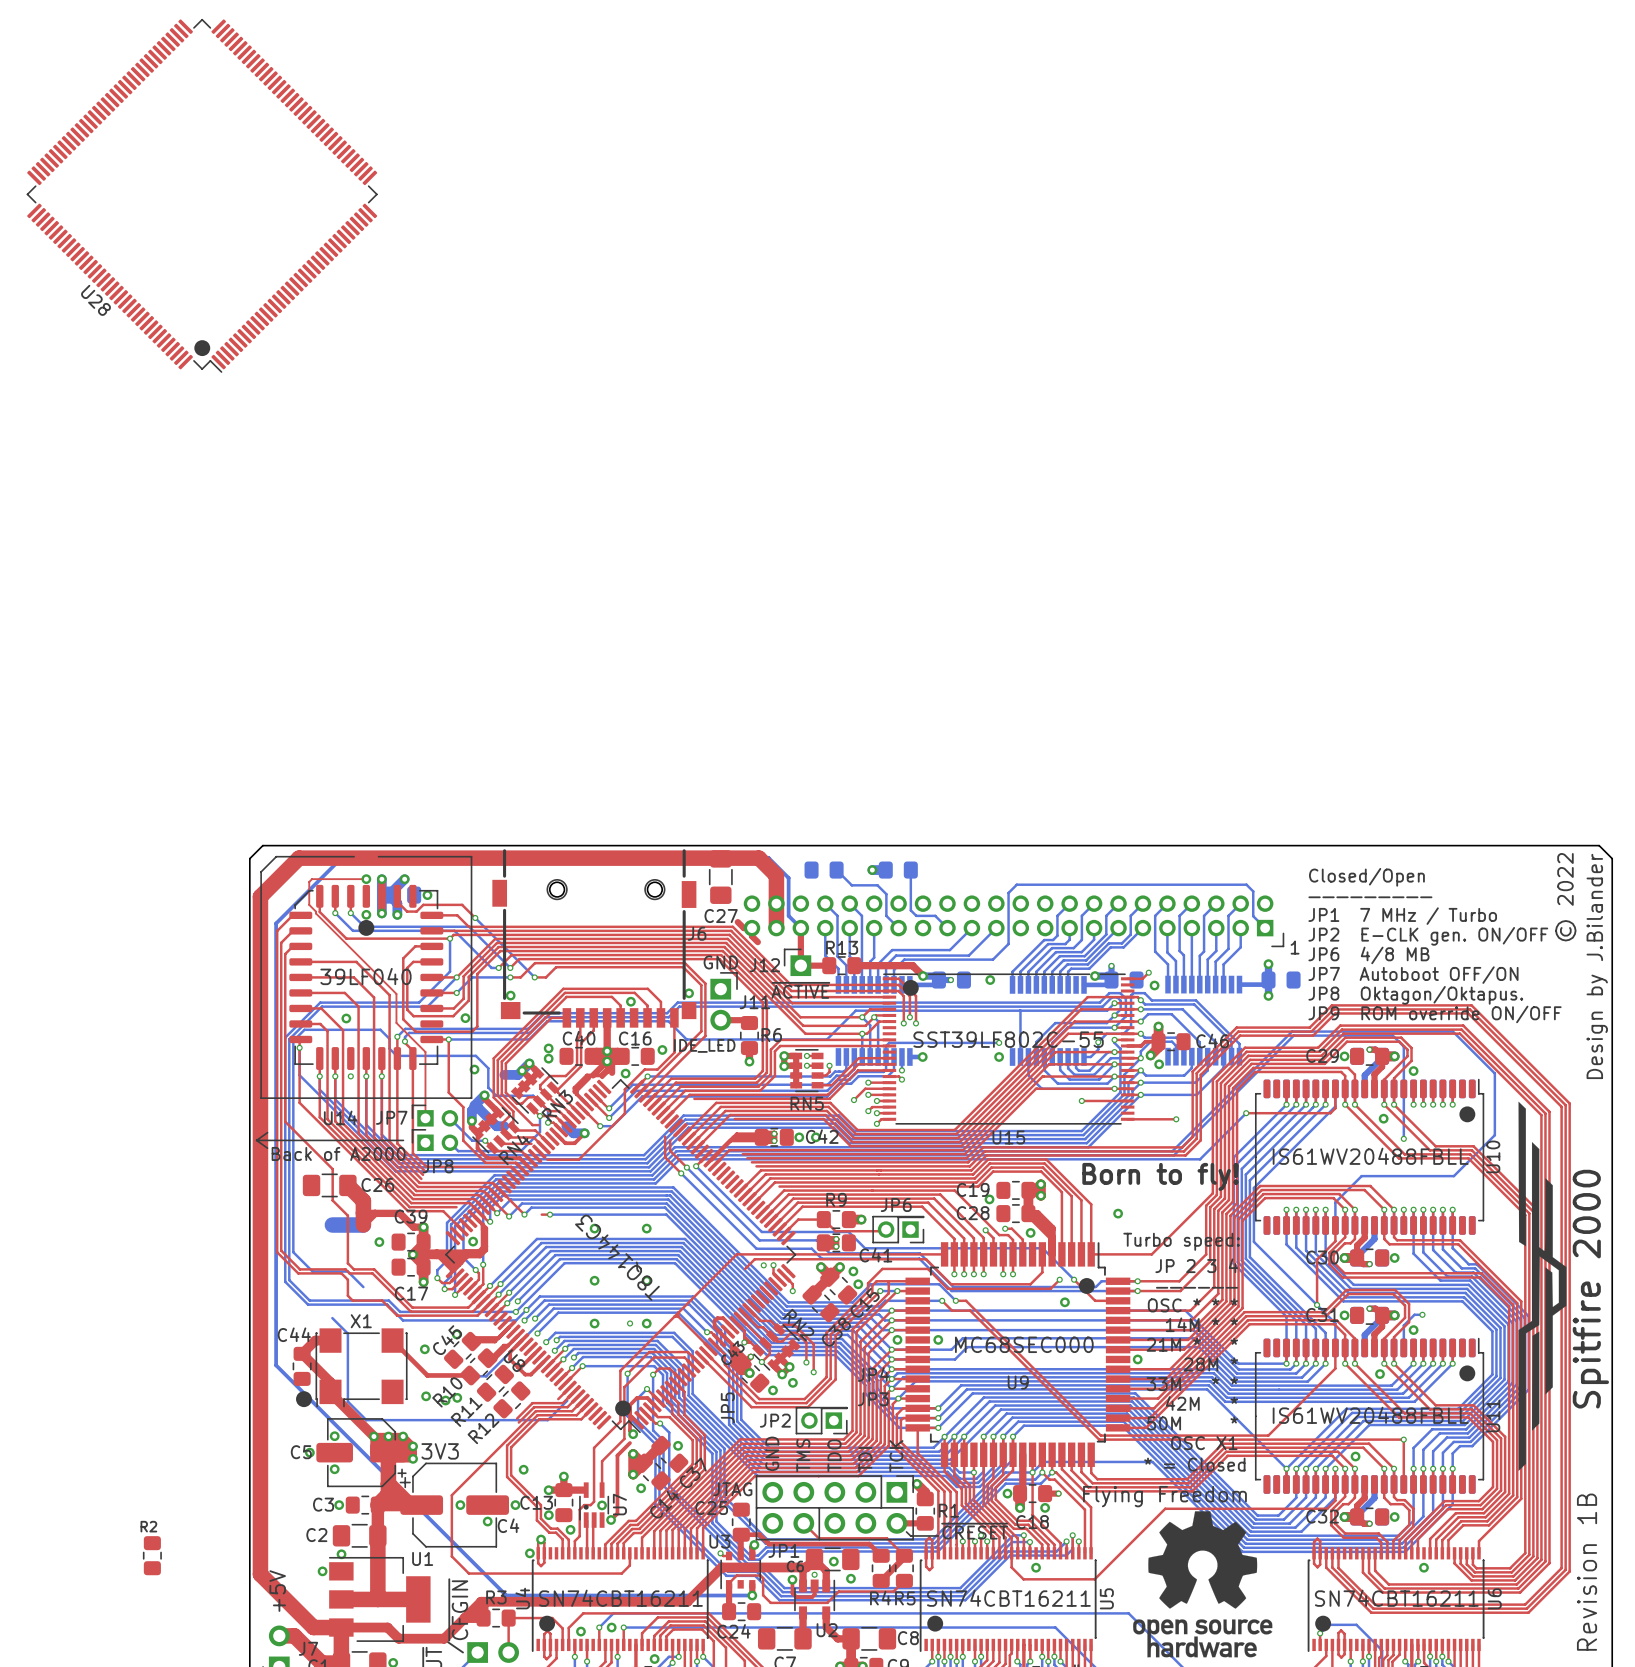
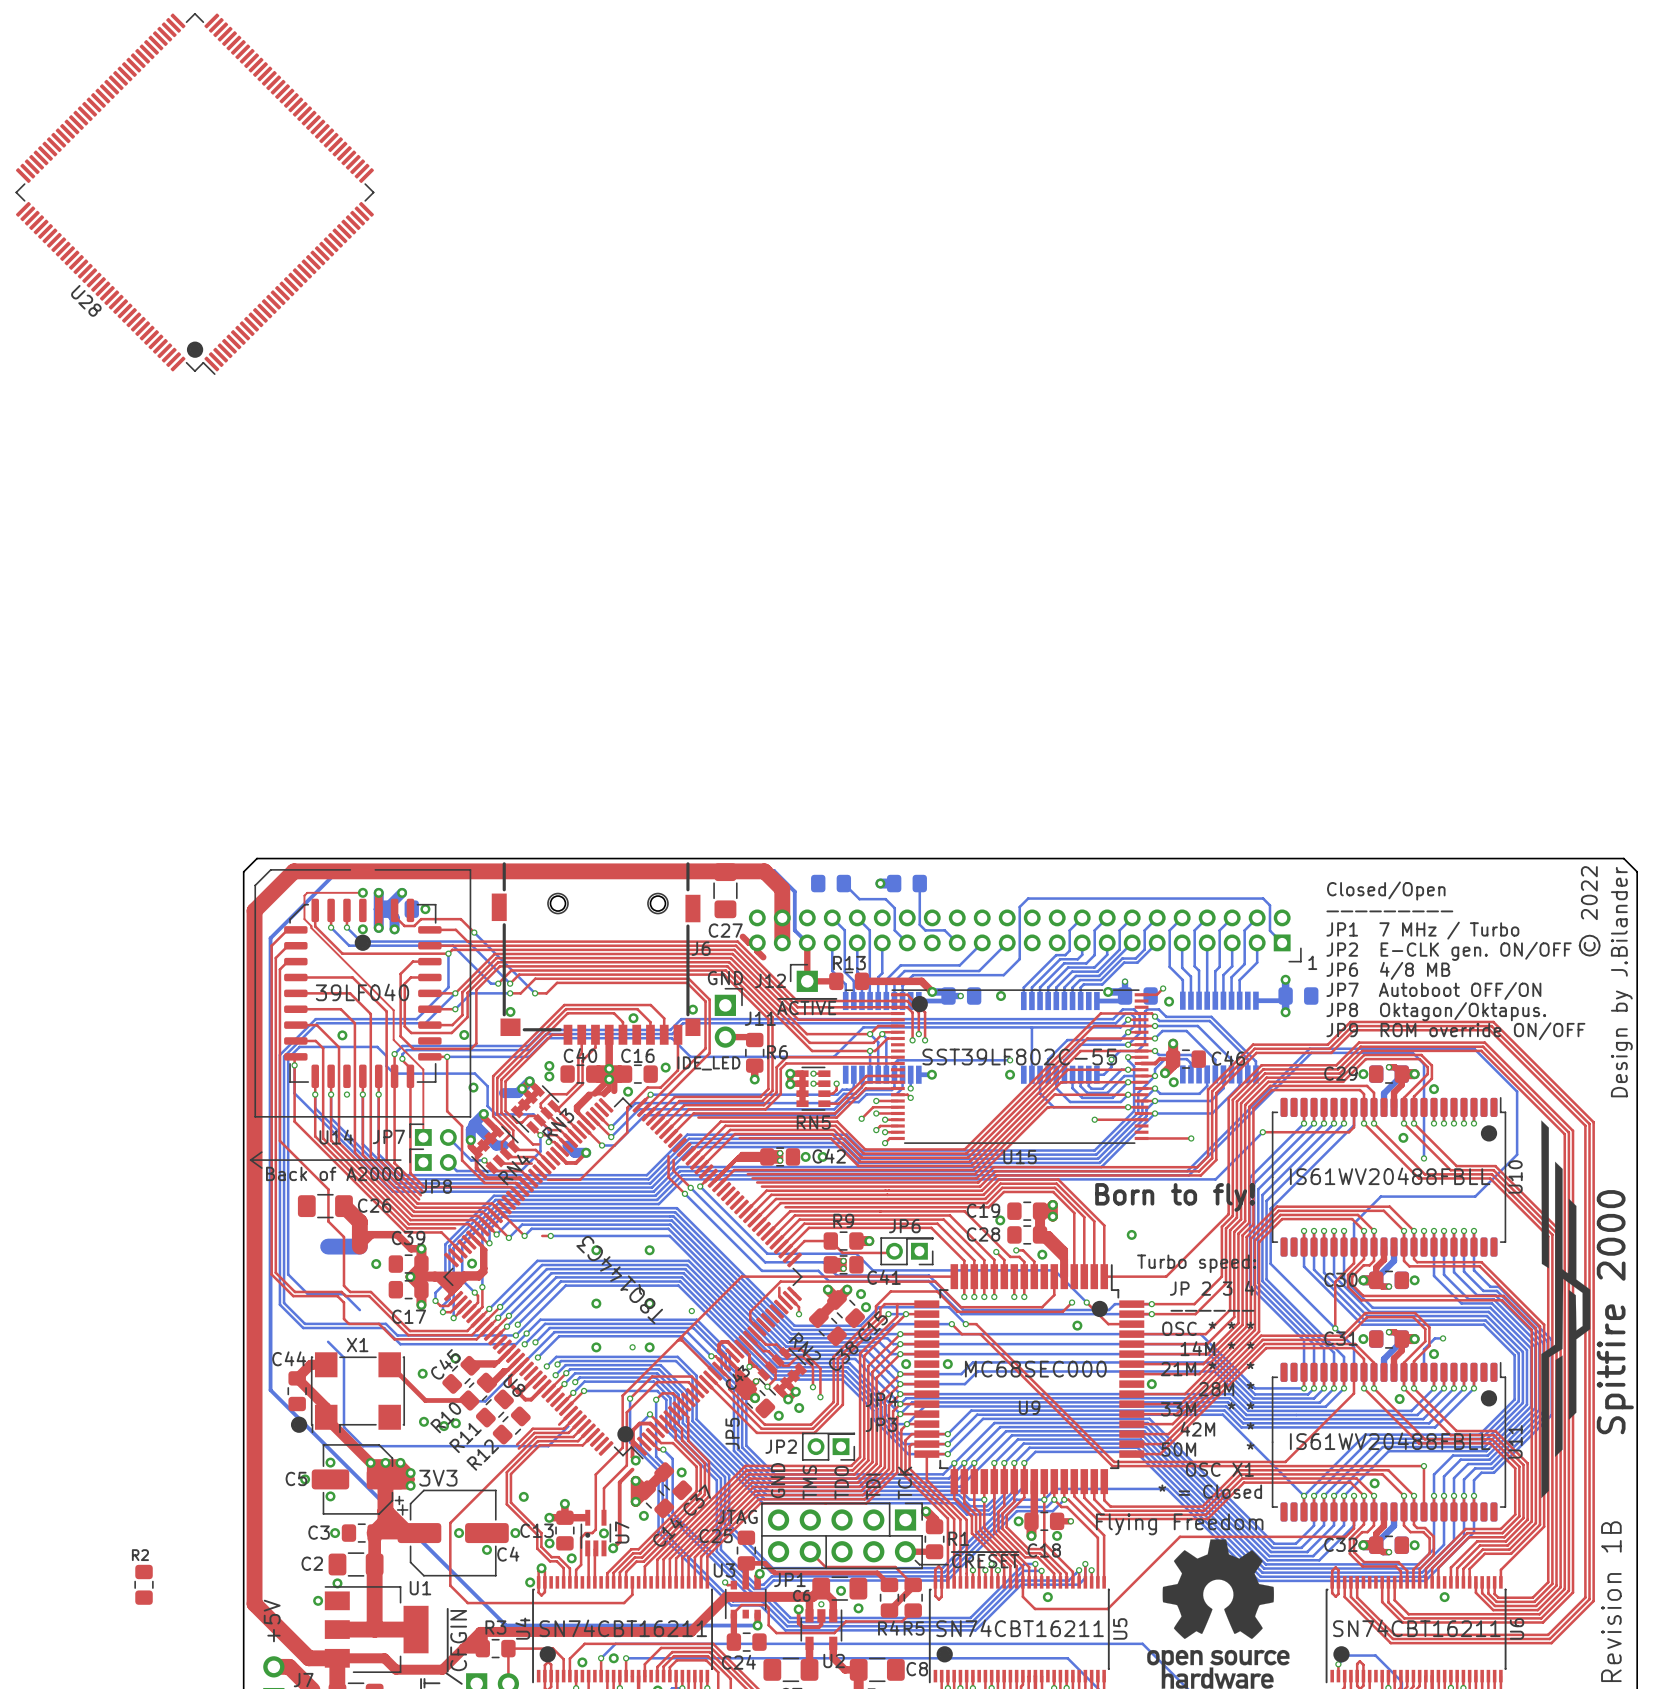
top track: (774, 1259) (754, 1259) (745, 1268) -> (780, 1281) (750, 1311) (750, 1320) (759, 1329)
via: (763, 1265) -> none
via: (773, 1265) -> none
via: none -> (691, 1311)

